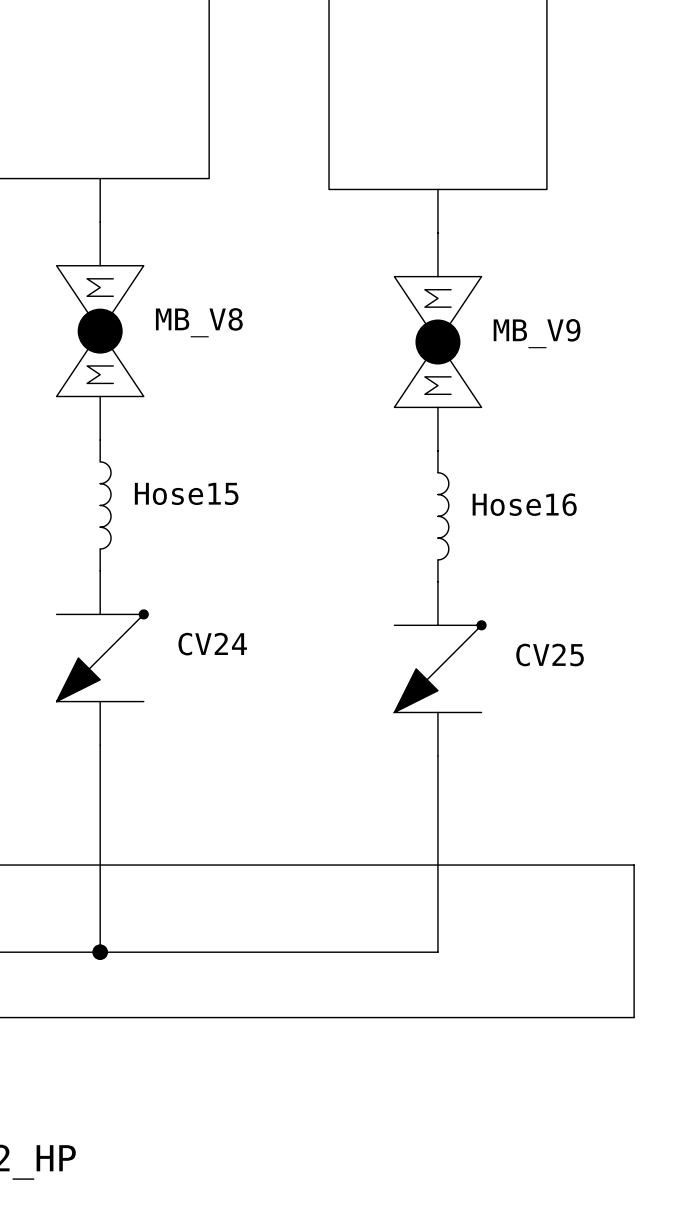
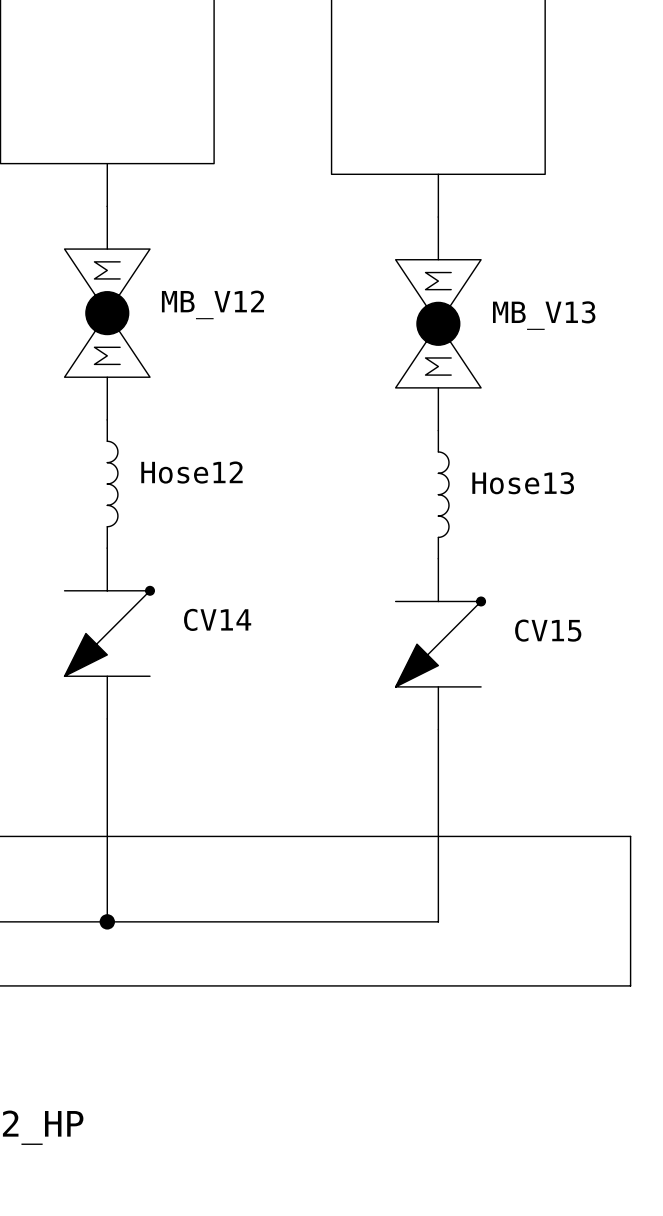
MB_V8 name: MB_V8 (199, 322) -> MB_V12 (212, 304)
MB_V9 name: MB_V9 (537, 333) -> MB_V13 (544, 315)
Hose15 name: Hose15 (186, 493) -> Hose12 (191, 472)
Hose16 name: Hose16 (524, 504) -> Hose13 (523, 483)
CV24 name: CV24 (212, 644) -> CV14 (217, 619)
CV25 name: CV25 (550, 655) -> CV15 (548, 630)

